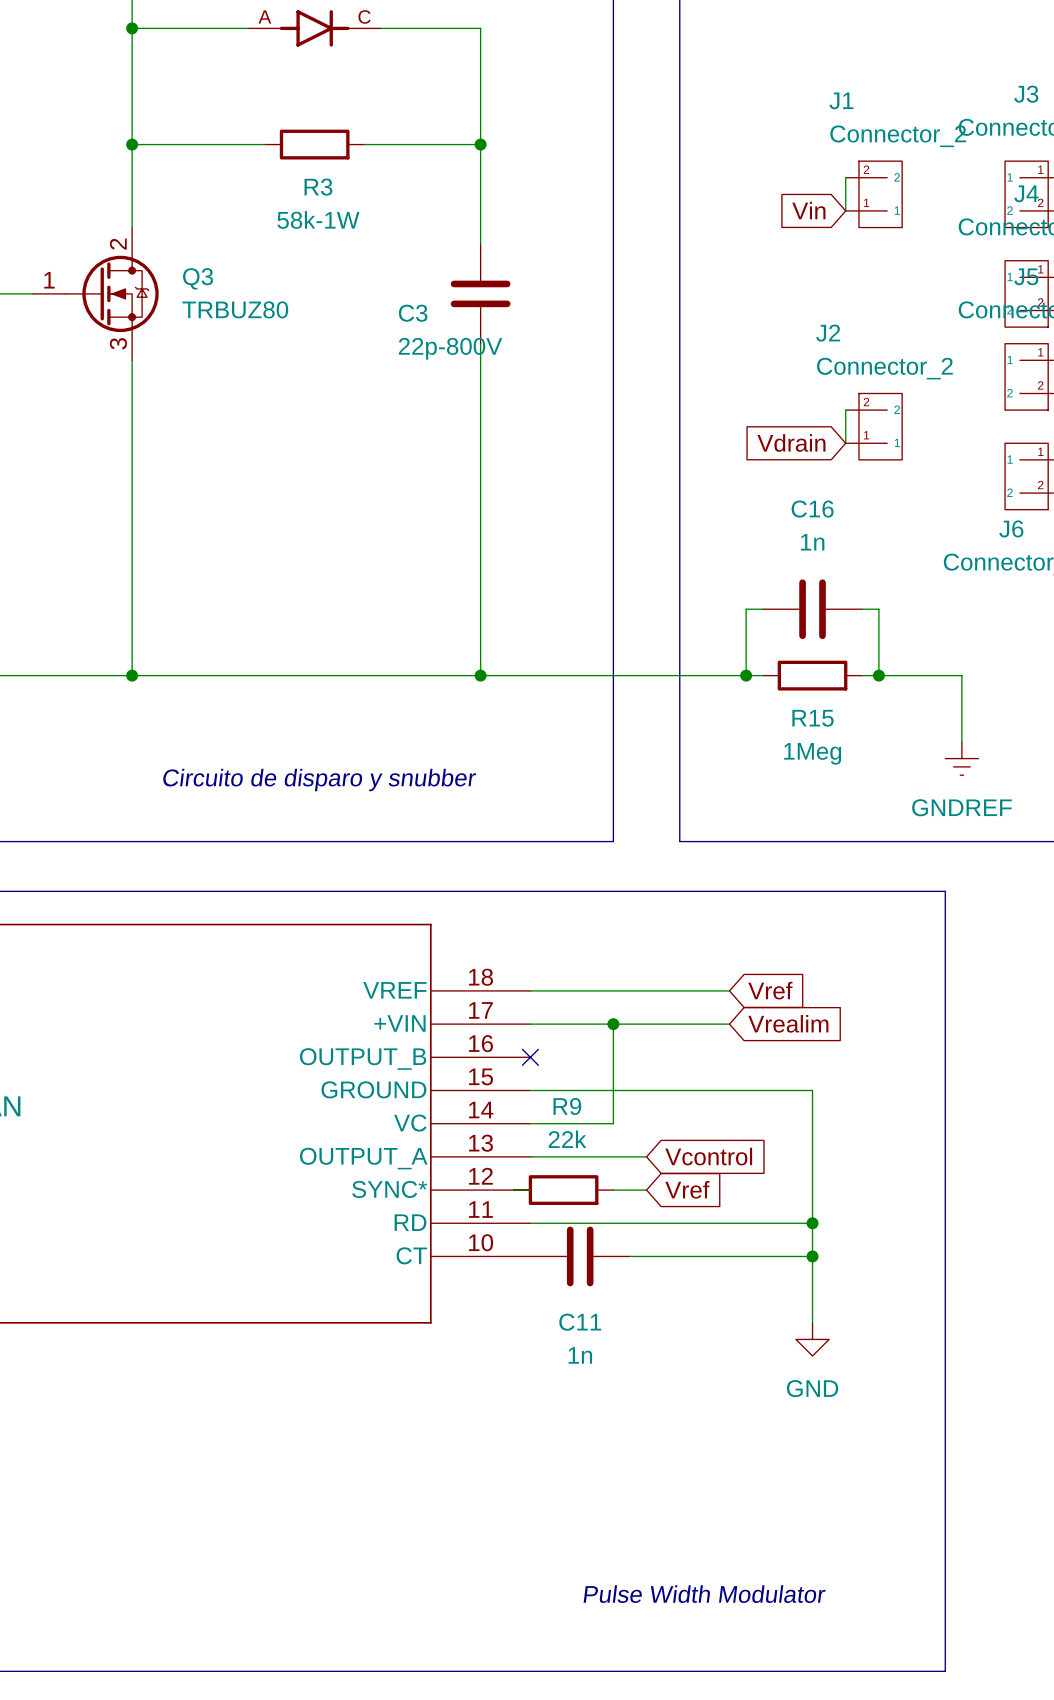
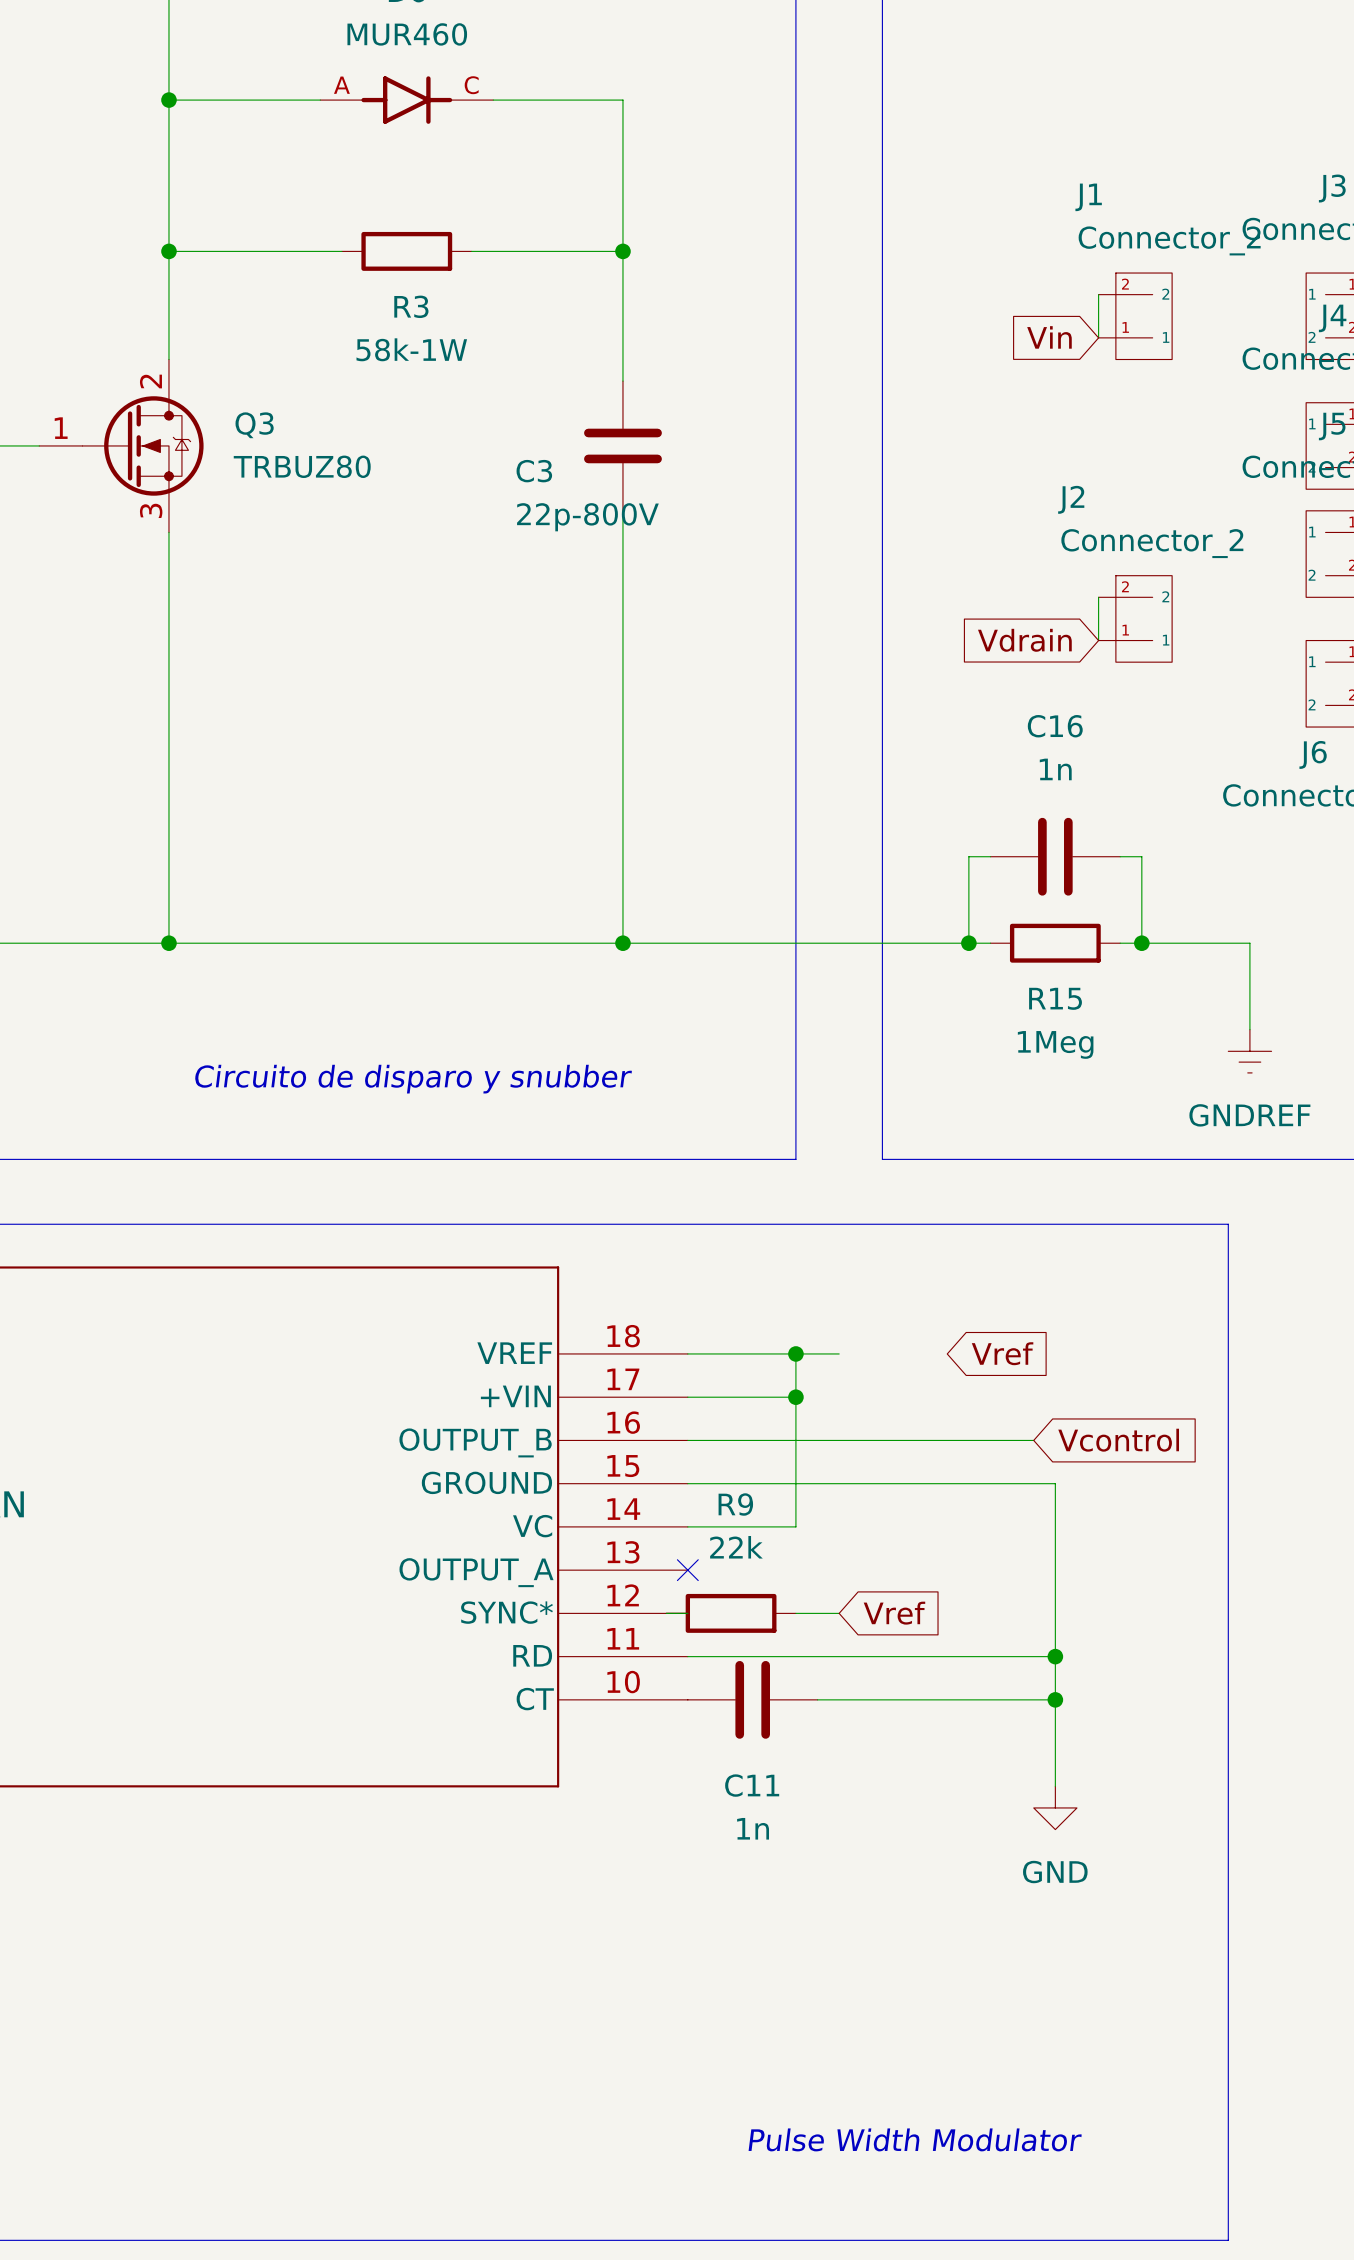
junction: none -> (795, 1353)
wire: (646, 990) (729, 990) -> none
global label: Vrealim (788, 1023) -> none
wire: (613, 1024) (729, 1024) -> (795, 1397) (795, 1353)
wire: none -> (687, 1440) (1033, 1440)
no-connect mark: (530, 1057) -> none
wire: (530, 1156) (646, 1156) -> none
no-connect mark: none -> (687, 1570)
global label position: Vcontrol (708, 1156) -> Vcontrol (1118, 1440)

